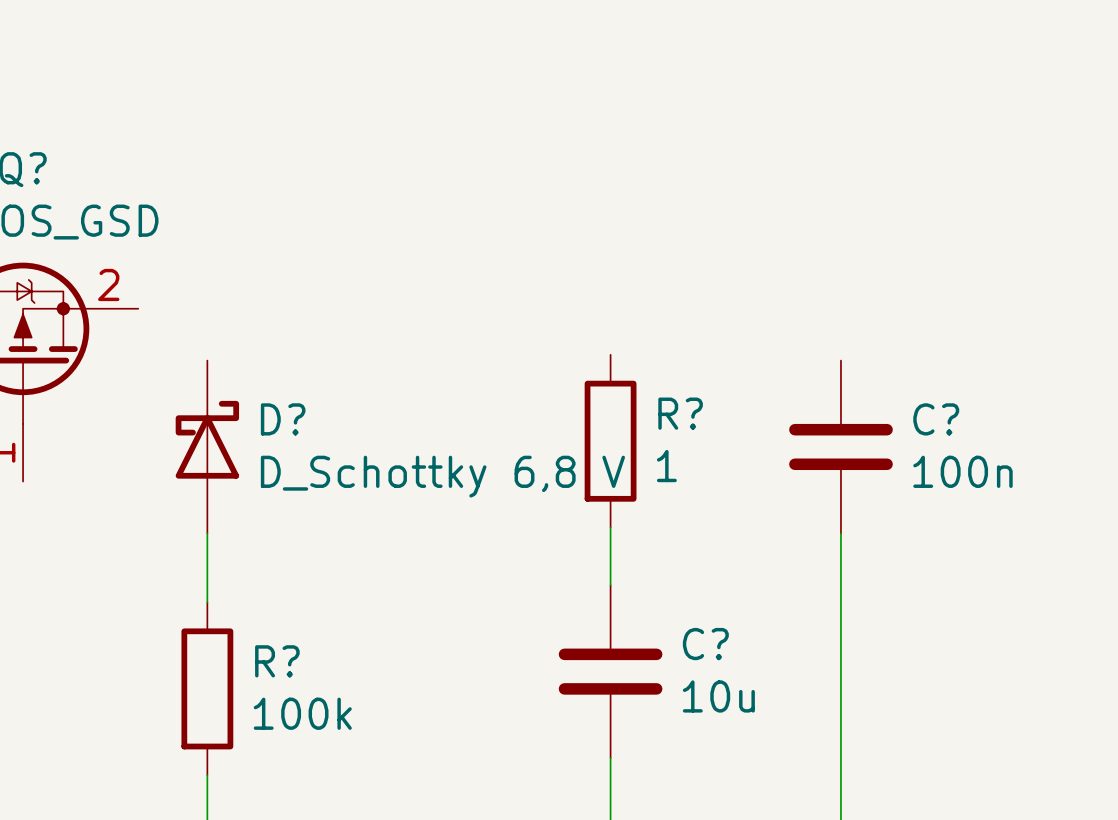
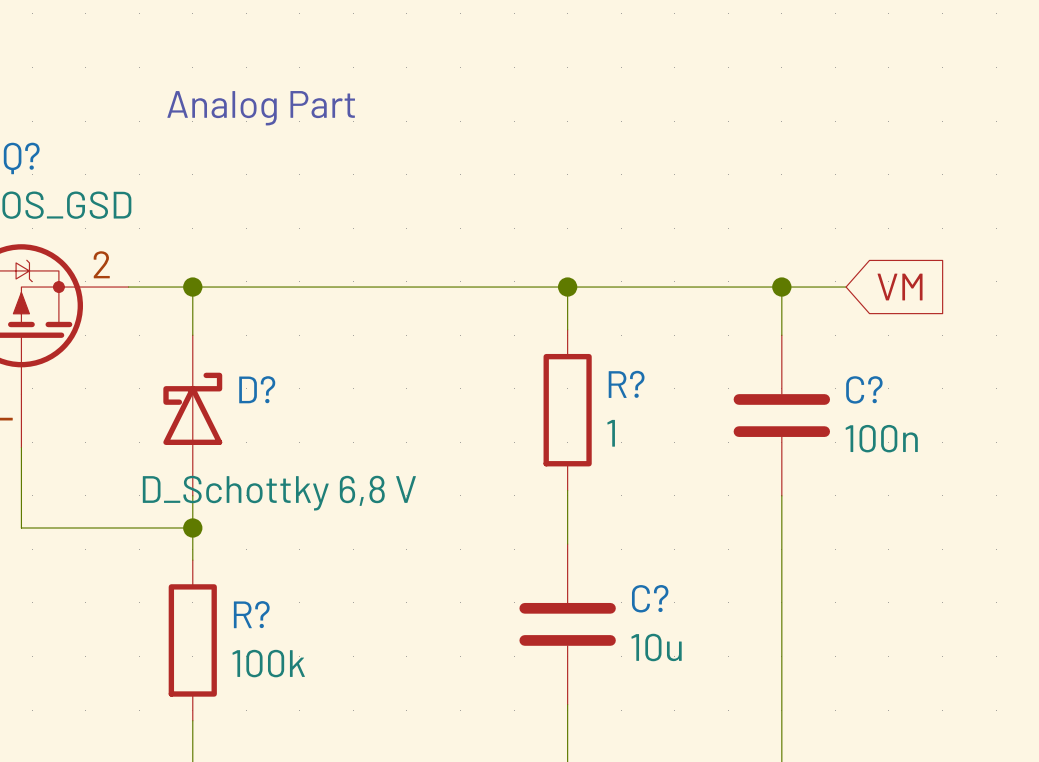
text: none -> Analog Part (261, 108)
wire: none -> (128, 287) (846, 287)
wire: none -> (192, 287) (192, 335)
junction: none -> (192, 287)
wire: none -> (567, 287) (567, 329)
junction: none -> (567, 287)
wire: none -> (781, 287) (781, 335)
junction: none -> (781, 287)
global label: none -> VM (900, 287)
D? value position: D_Schottky 6,8 V (442, 476) -> D_Schottky 6,8 V (279, 493)
wire: none -> (21, 447) (21, 527) (192, 527)
junction: none -> (192, 527)

